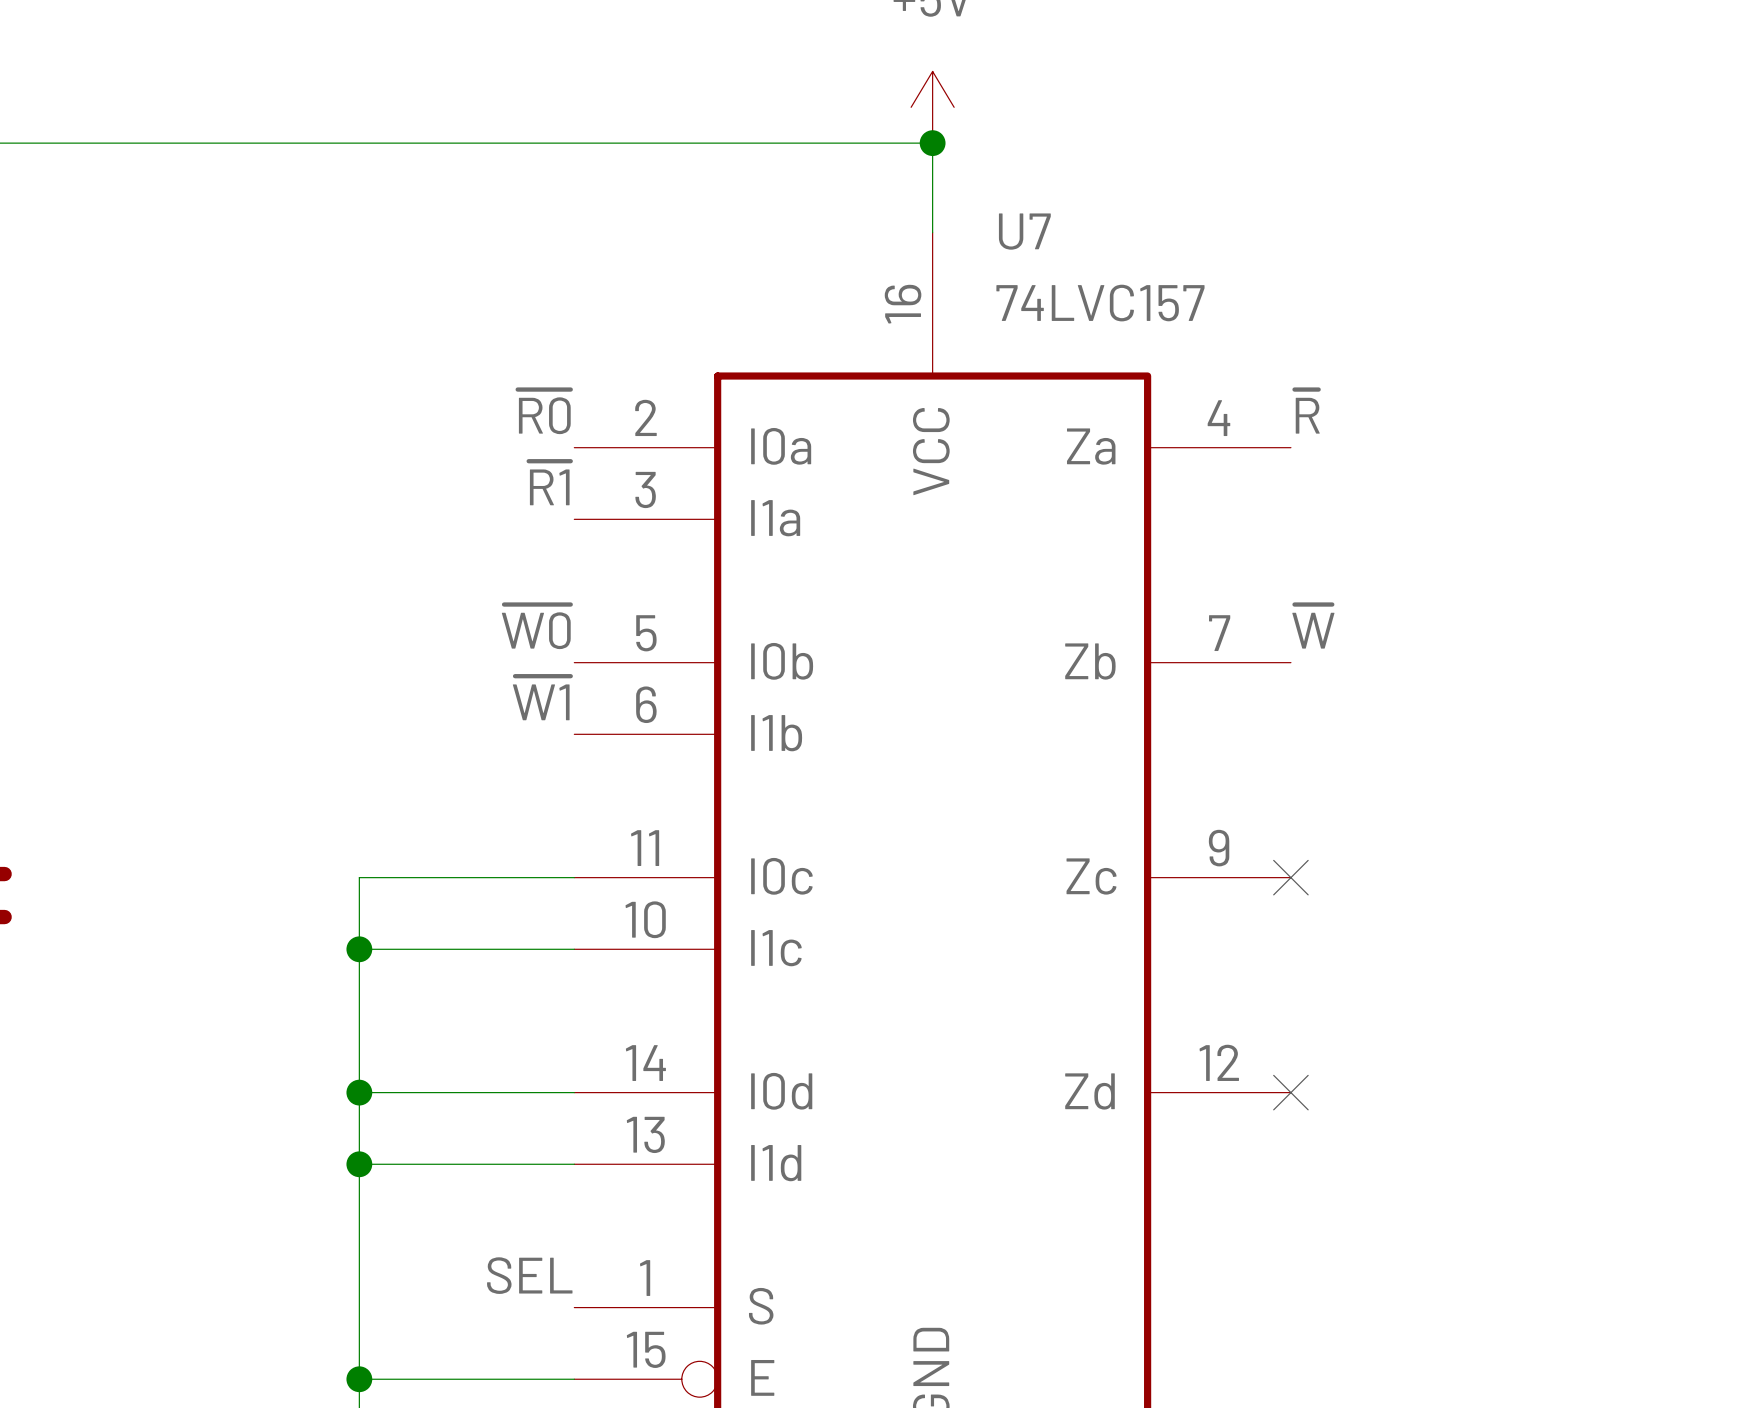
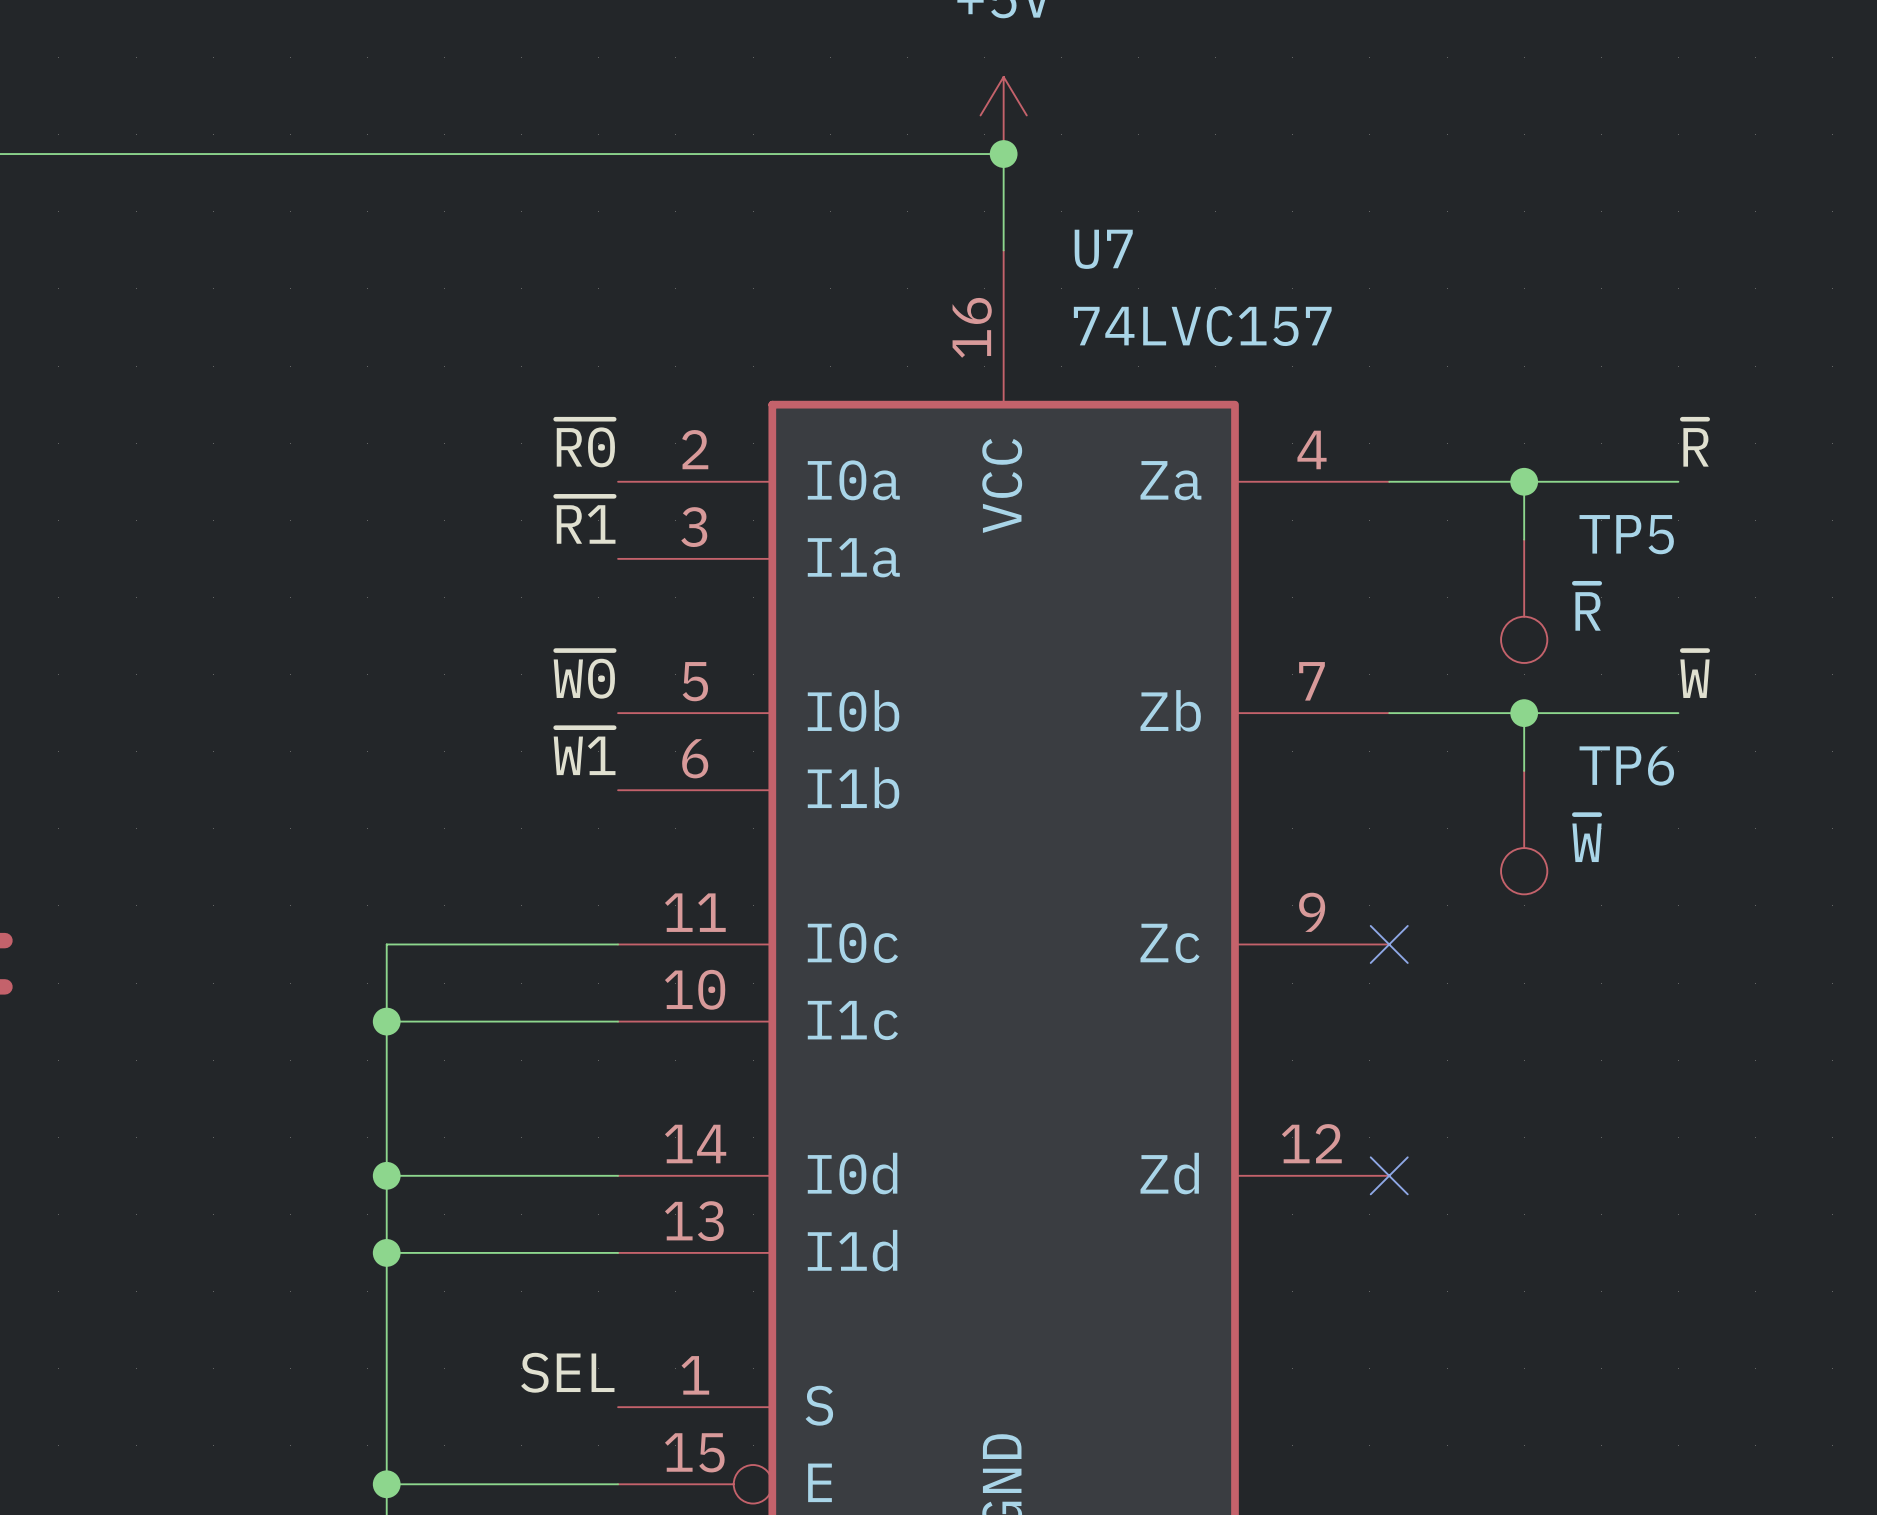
label position: ~{R} (1307, 411) -> ~{R} (1695, 442)
wire: none -> (1389, 481) (1678, 481)
wire: none -> (1524, 481) (1524, 539)
junction: none -> (1524, 481)
TP5: none -> ~{R} (1524, 601)
label position: ~{W} (1313, 626) -> ~{W} (1694, 674)
wire: none -> (1389, 713) (1678, 713)
wire: none -> (1524, 713) (1524, 770)
junction: none -> (1524, 713)
TP6: none -> ~{W} (1524, 832)

